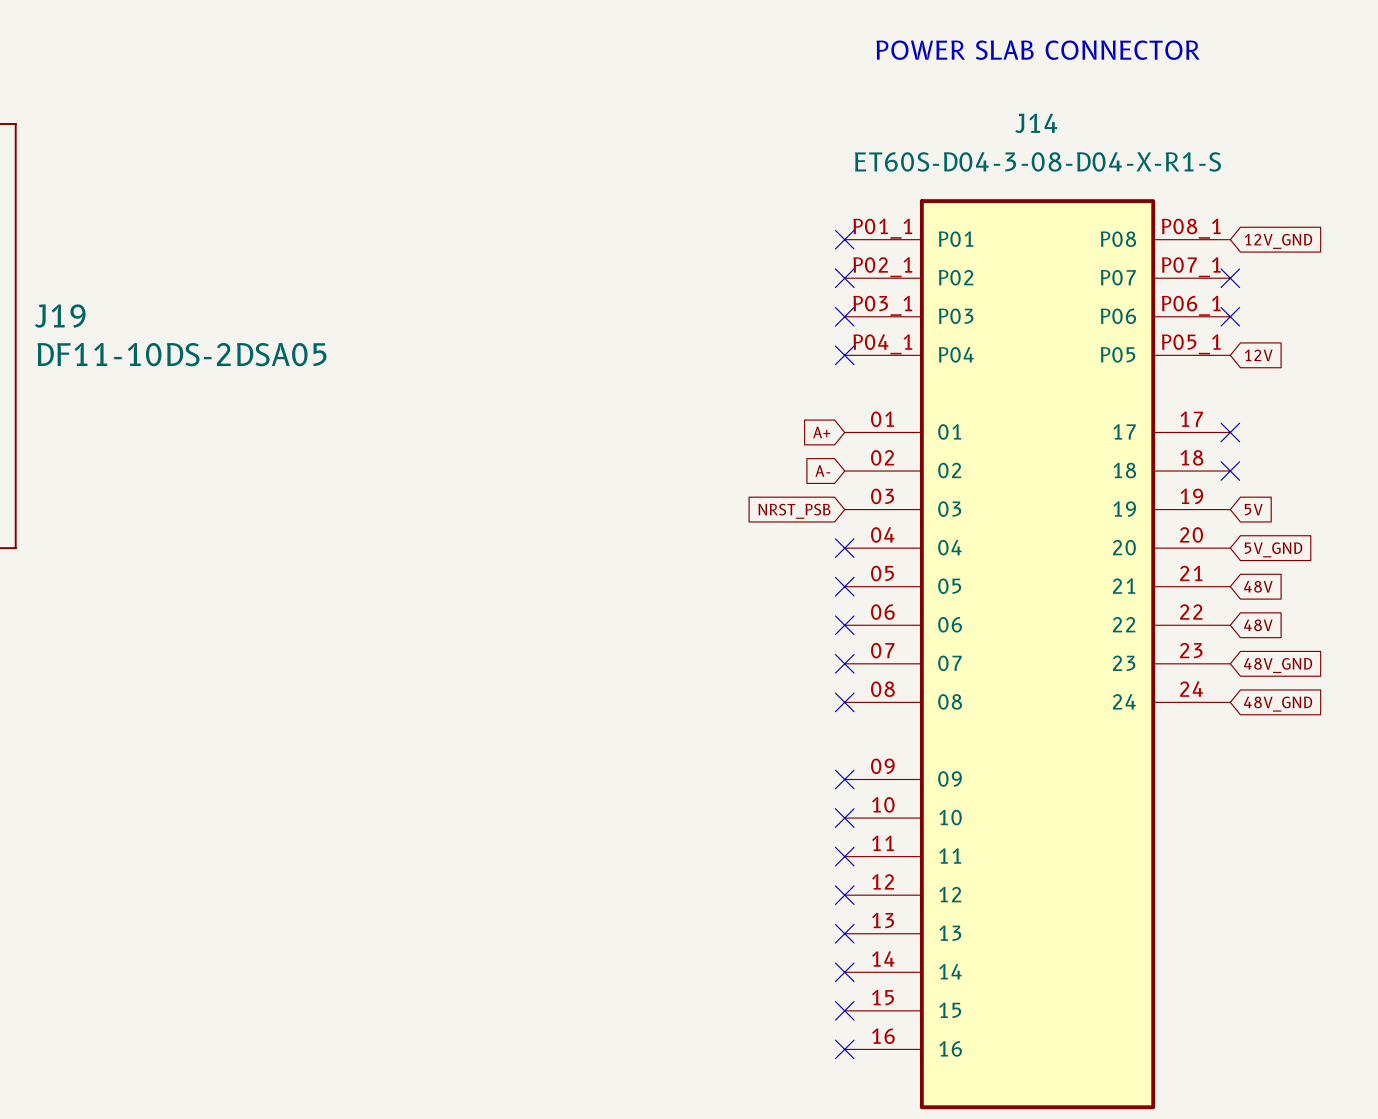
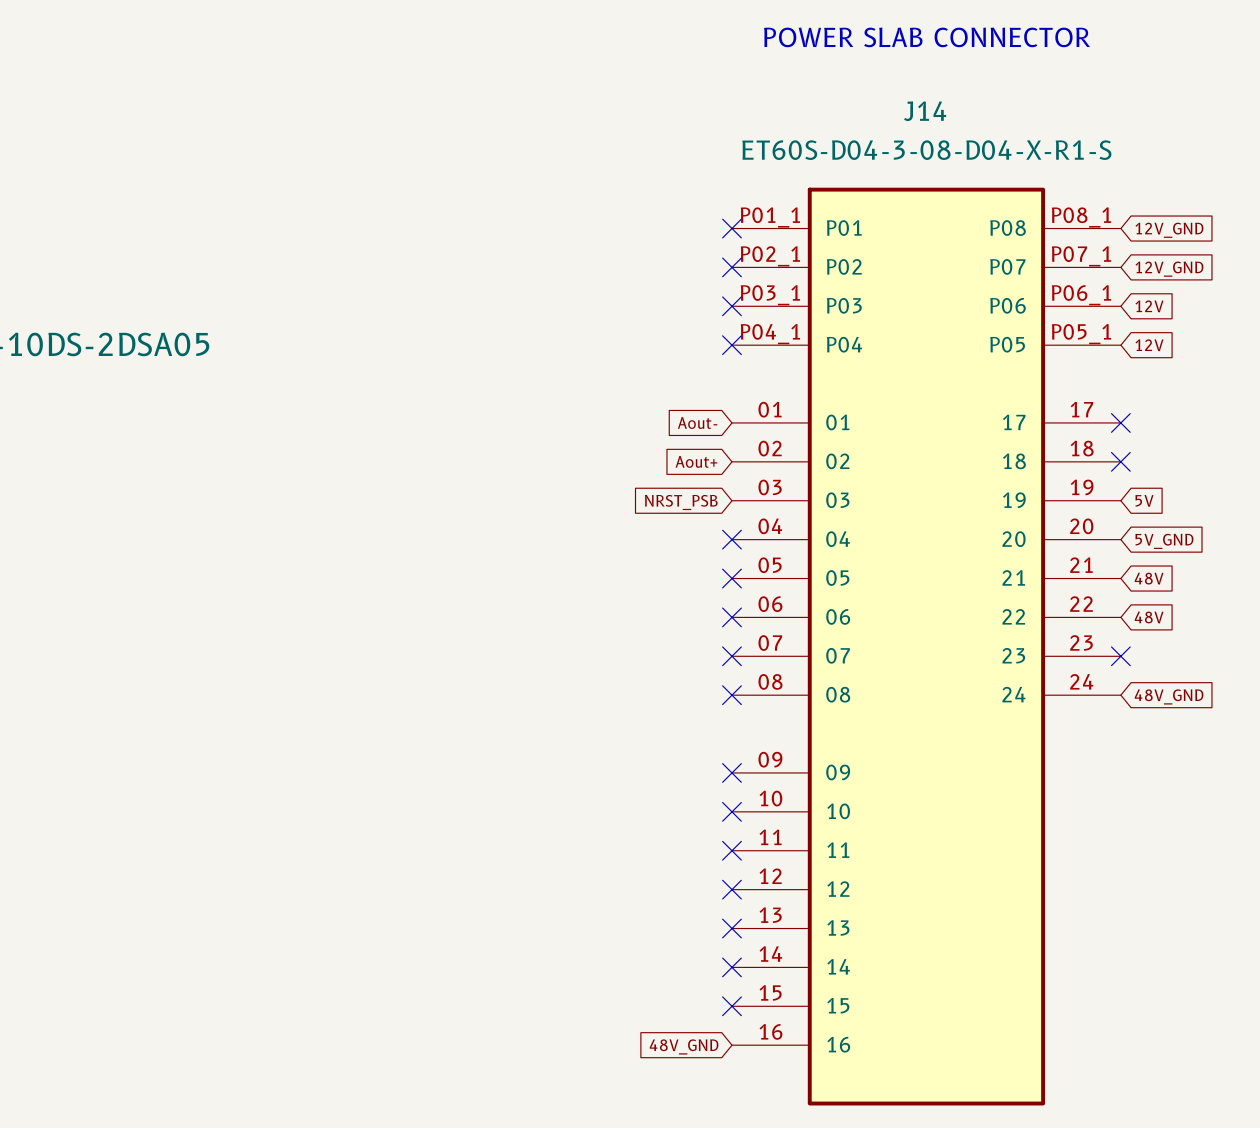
no-connect mark: (1230, 278) -> none
global label: none -> 12V_GND (1169, 269)
no-connect mark: (1230, 316) -> none
global label: none -> 12V (1149, 306)
global label: A+ (821, 432) -> Aout- (697, 423)
global label: A- (822, 471) -> Aout+ (696, 461)
no-connect mark: none -> (1120, 656)
global label: 48V_GND (1278, 665) -> none
no-connect mark: (844, 1049) -> none
global label: none -> 48V_GND (684, 1046)

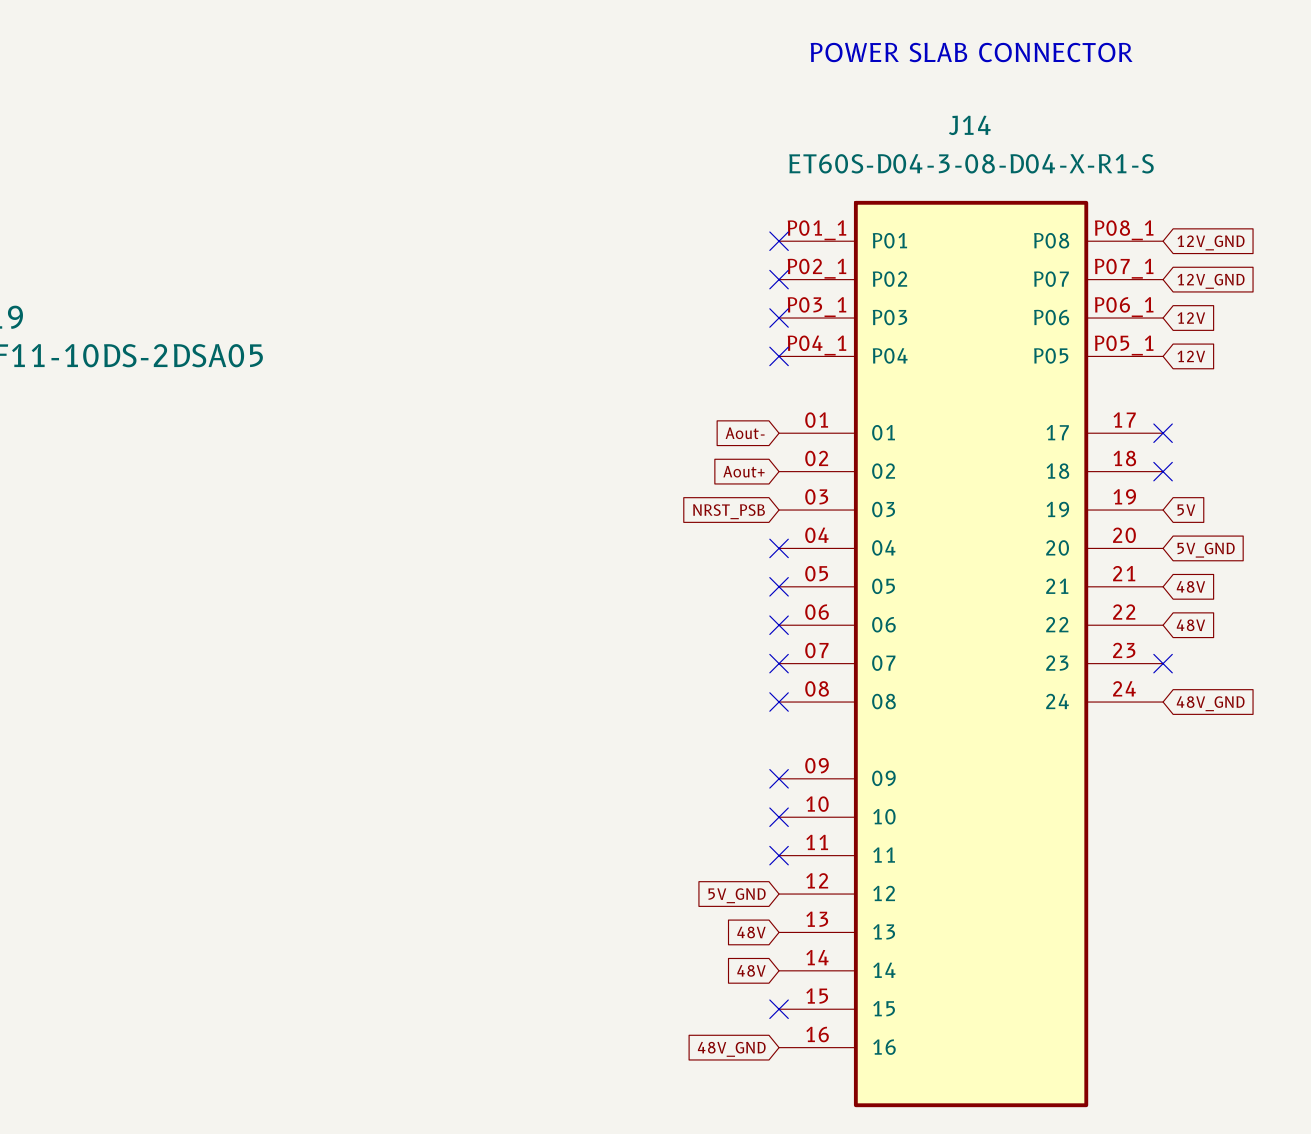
no-connect mark: (731, 889) -> none
global label: none -> 5V_GND (737, 895)
global label: none -> 48V (751, 932)
no-connect mark: (731, 928) -> none
global label: none -> 48V (751, 970)
no-connect mark: (731, 967) -> none

